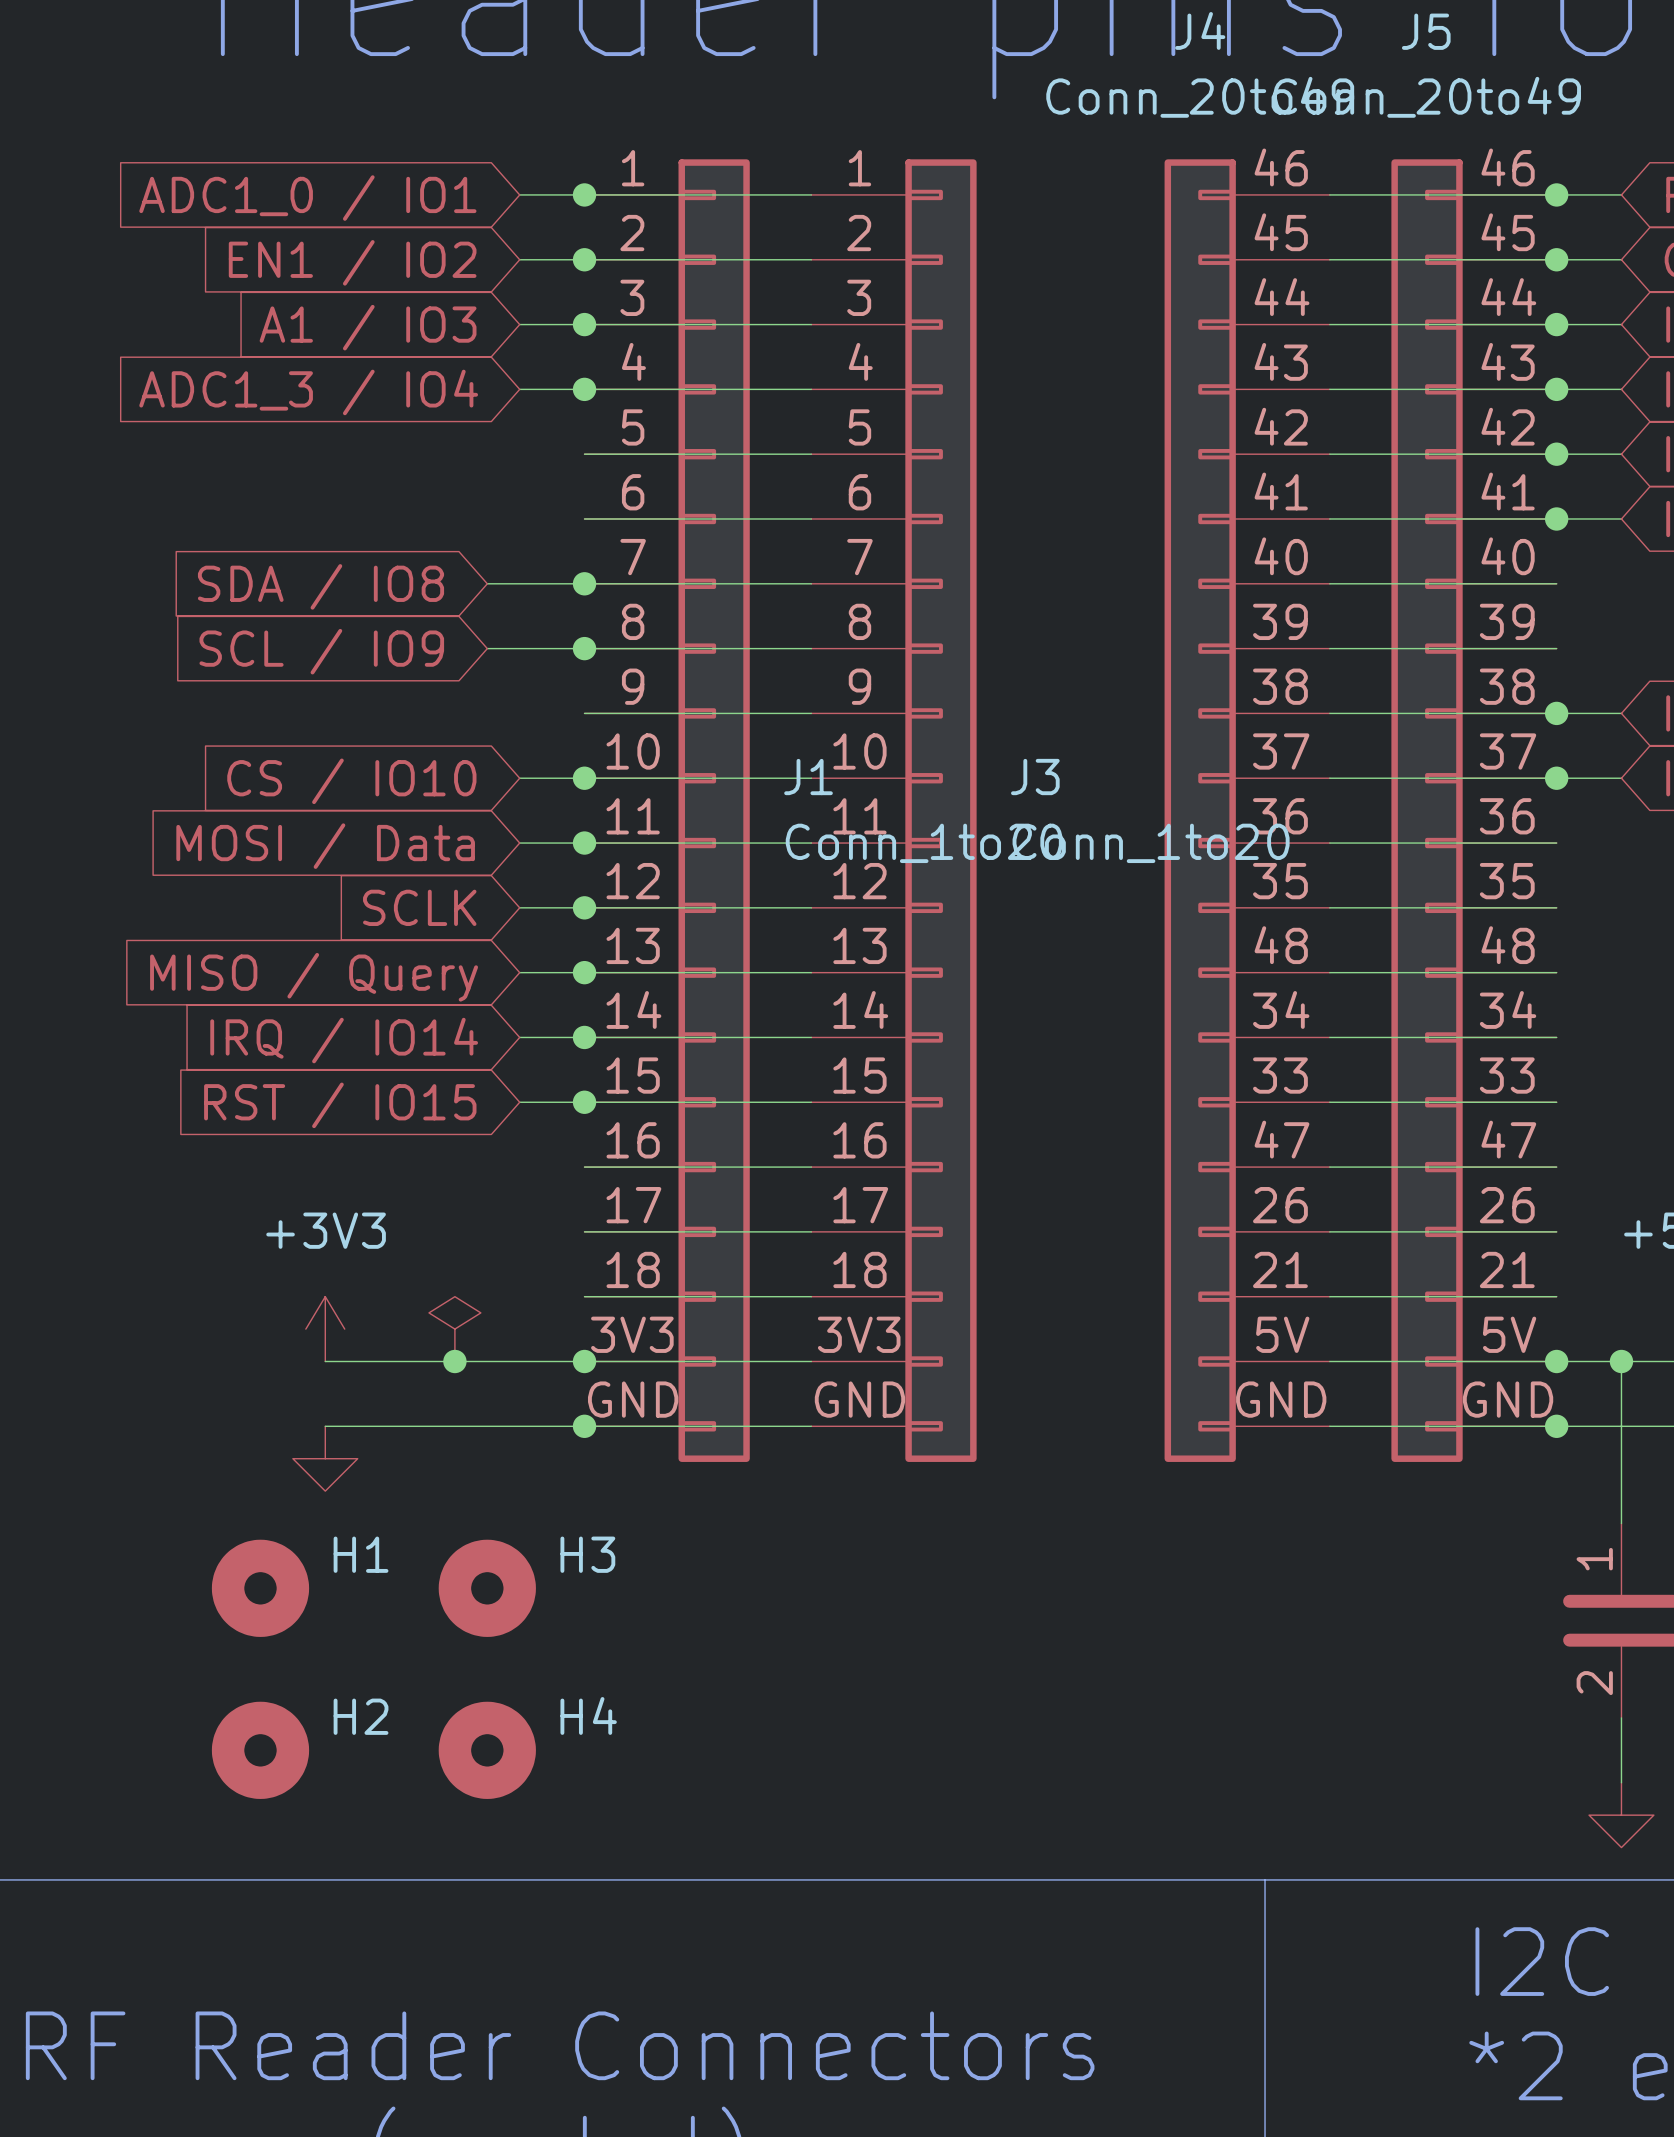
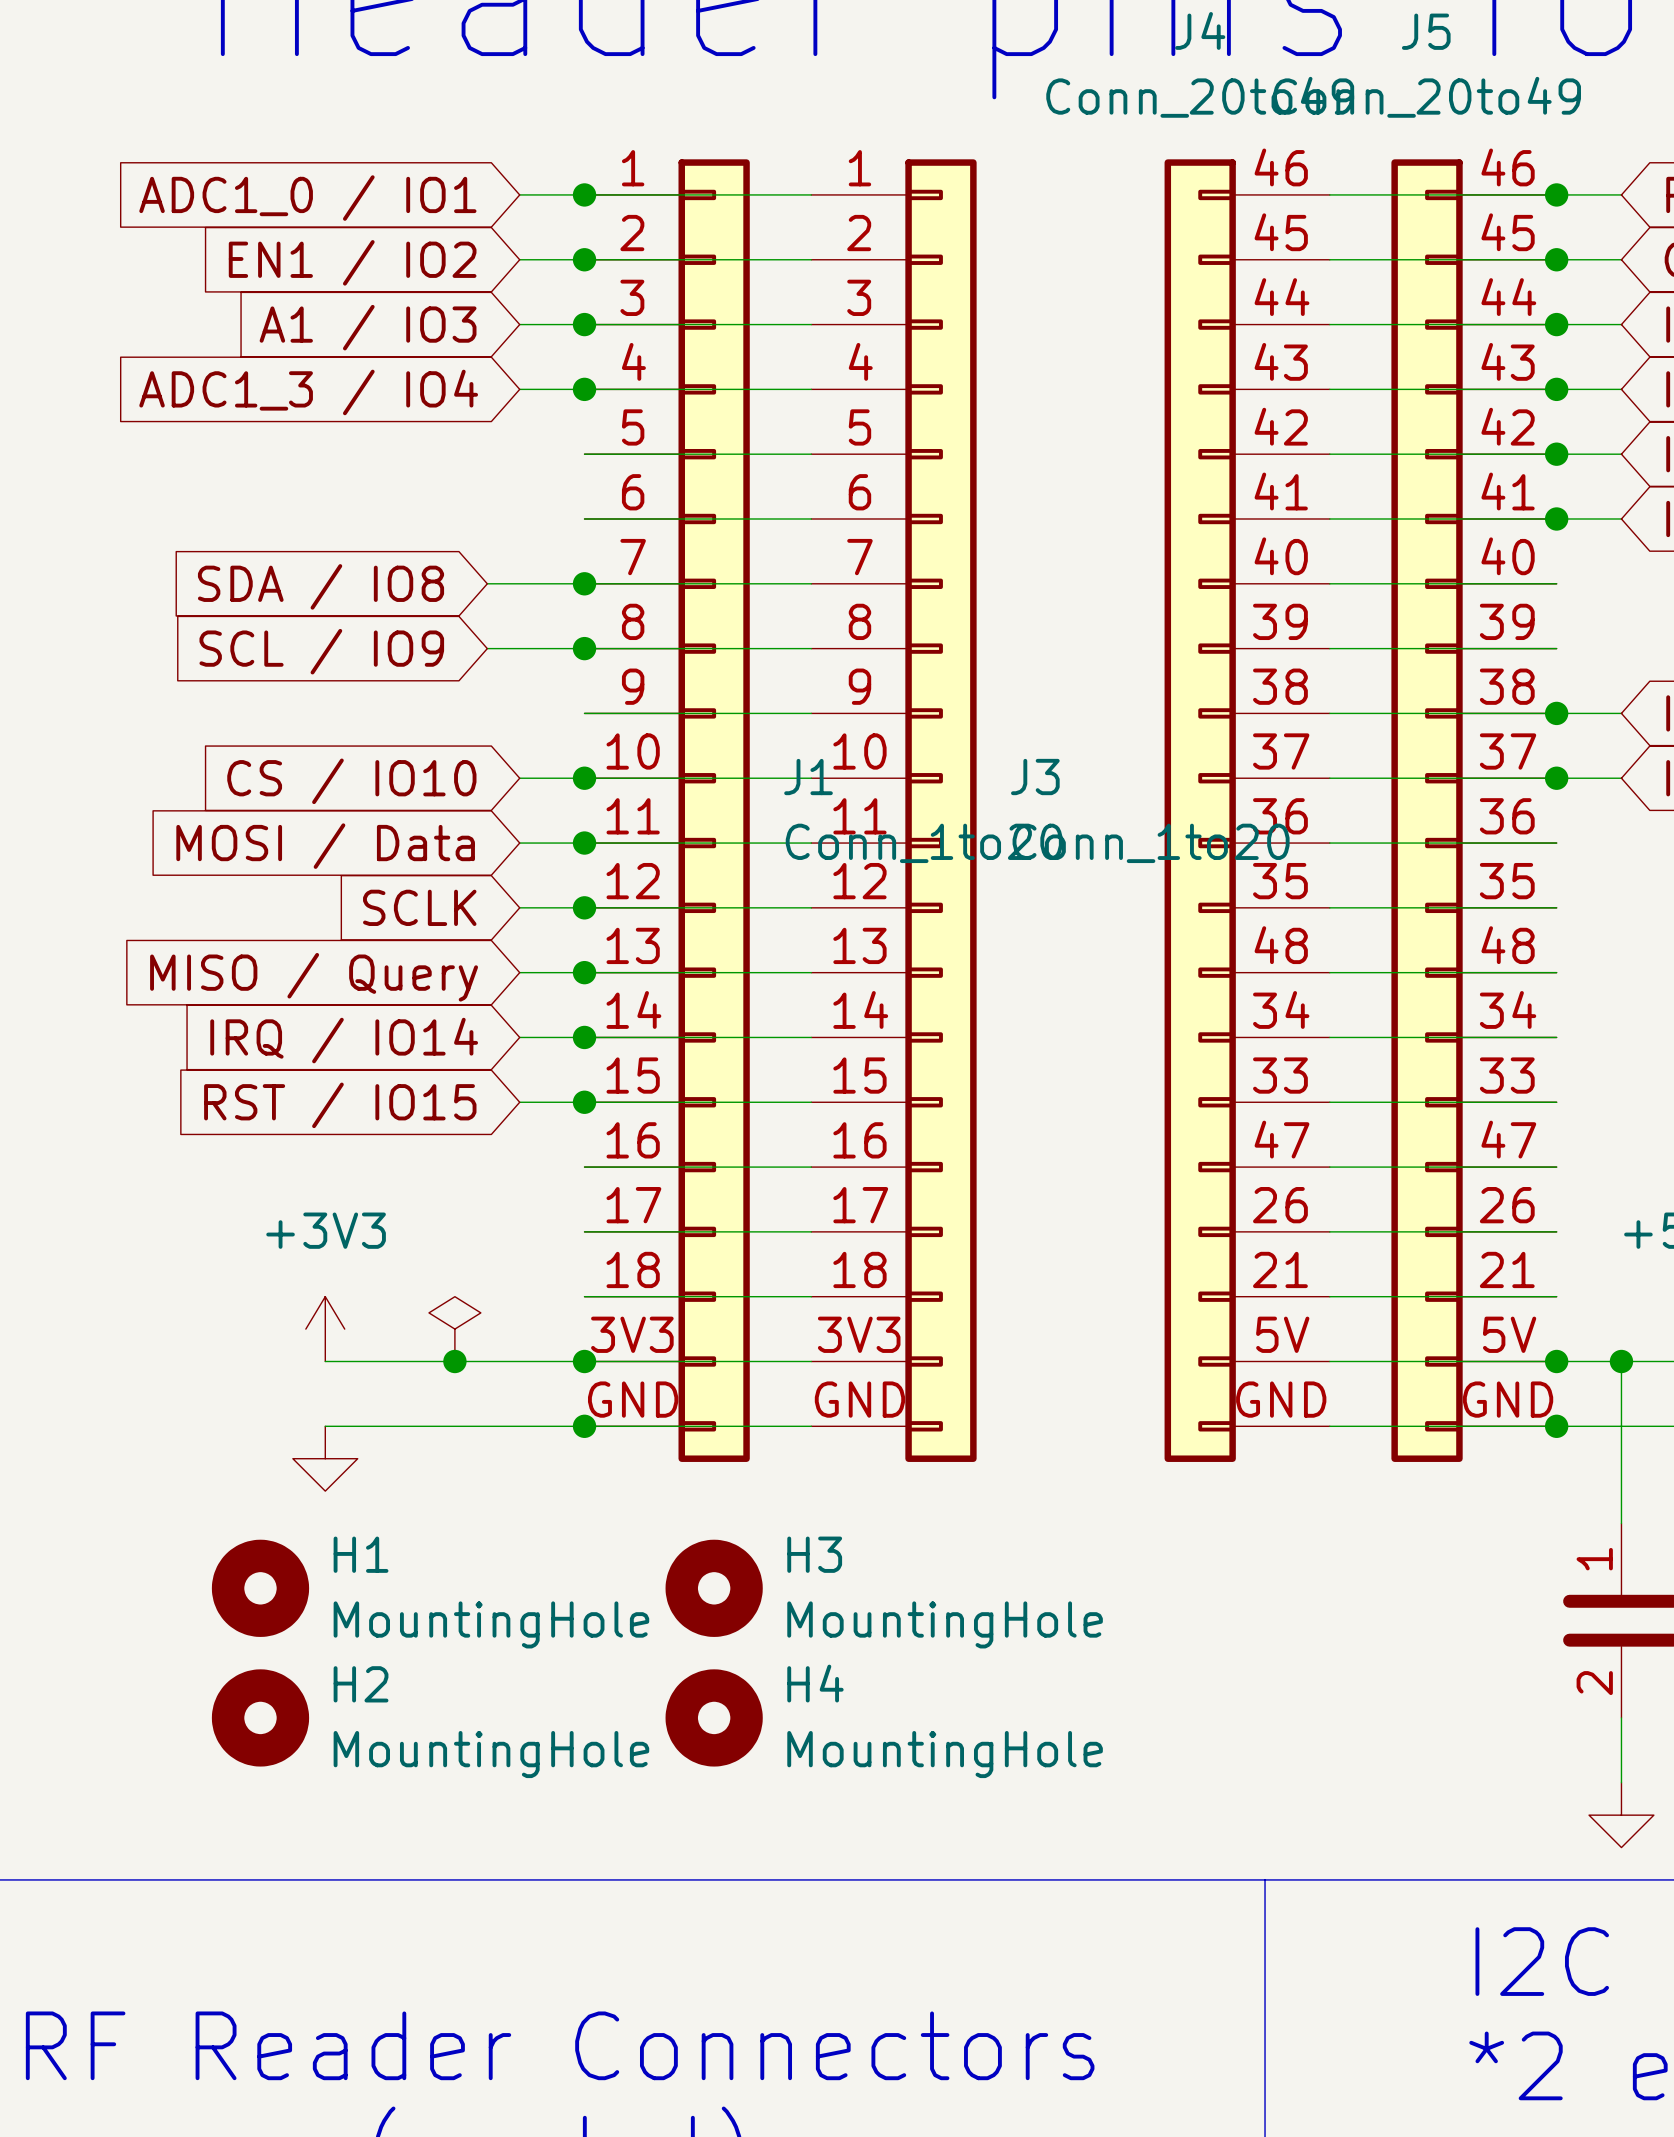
H3 position: (487, 1588) -> (714, 1588)
H1 value: none -> MountingHole (491, 1624)
H3 value: none -> MountingHole (945, 1624)
H2 position: (260, 1750) -> (260, 1717)
H4 position: (487, 1750) -> (714, 1717)
H2 value: none -> MountingHole (491, 1754)
H4 value: none -> MountingHole (945, 1754)

